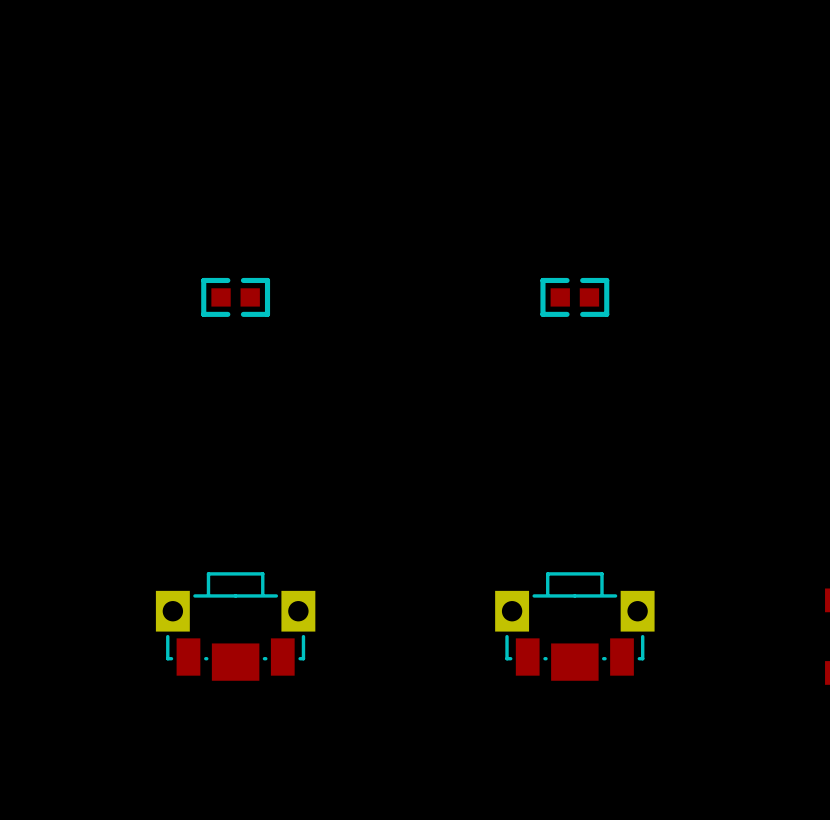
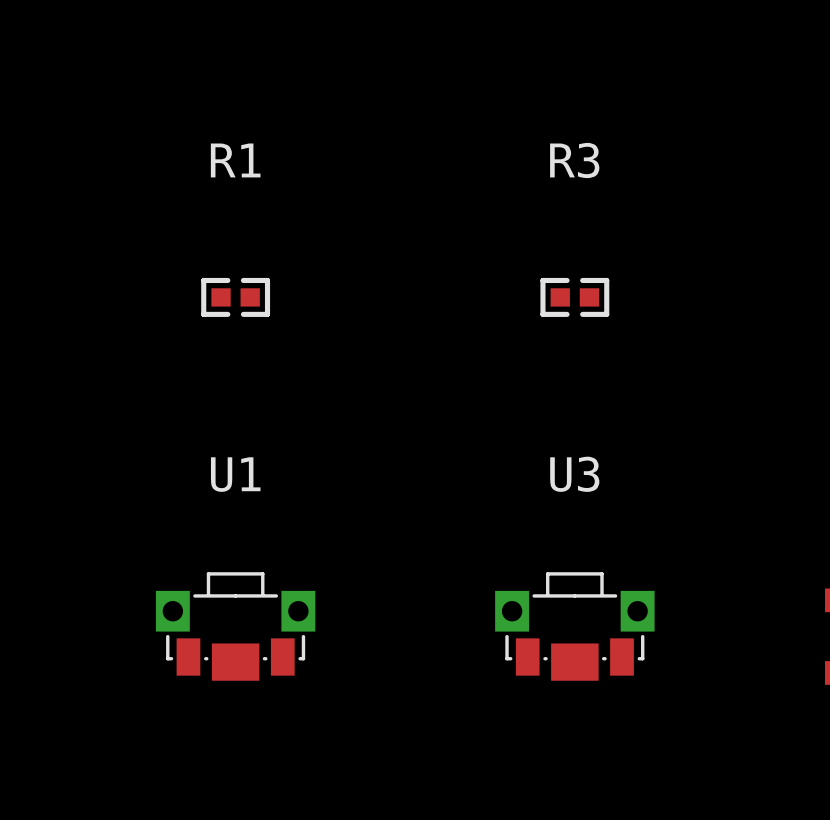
R1 name: none -> R1 (235, 160)
R3 name: none -> R3 (574, 160)
U1 name: none -> U1 (235, 474)
U3 name: none -> U3 (574, 474)

